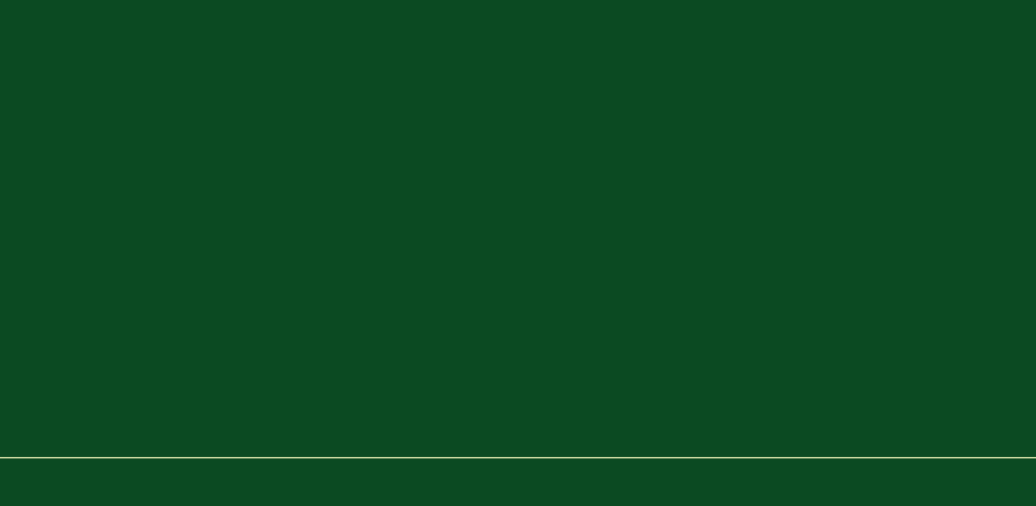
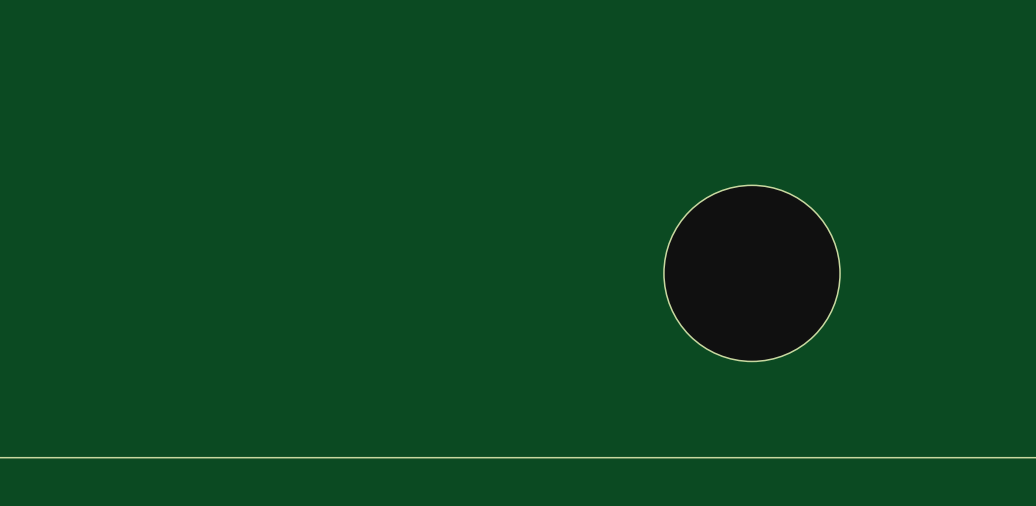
hole: none -> (751, 273)

